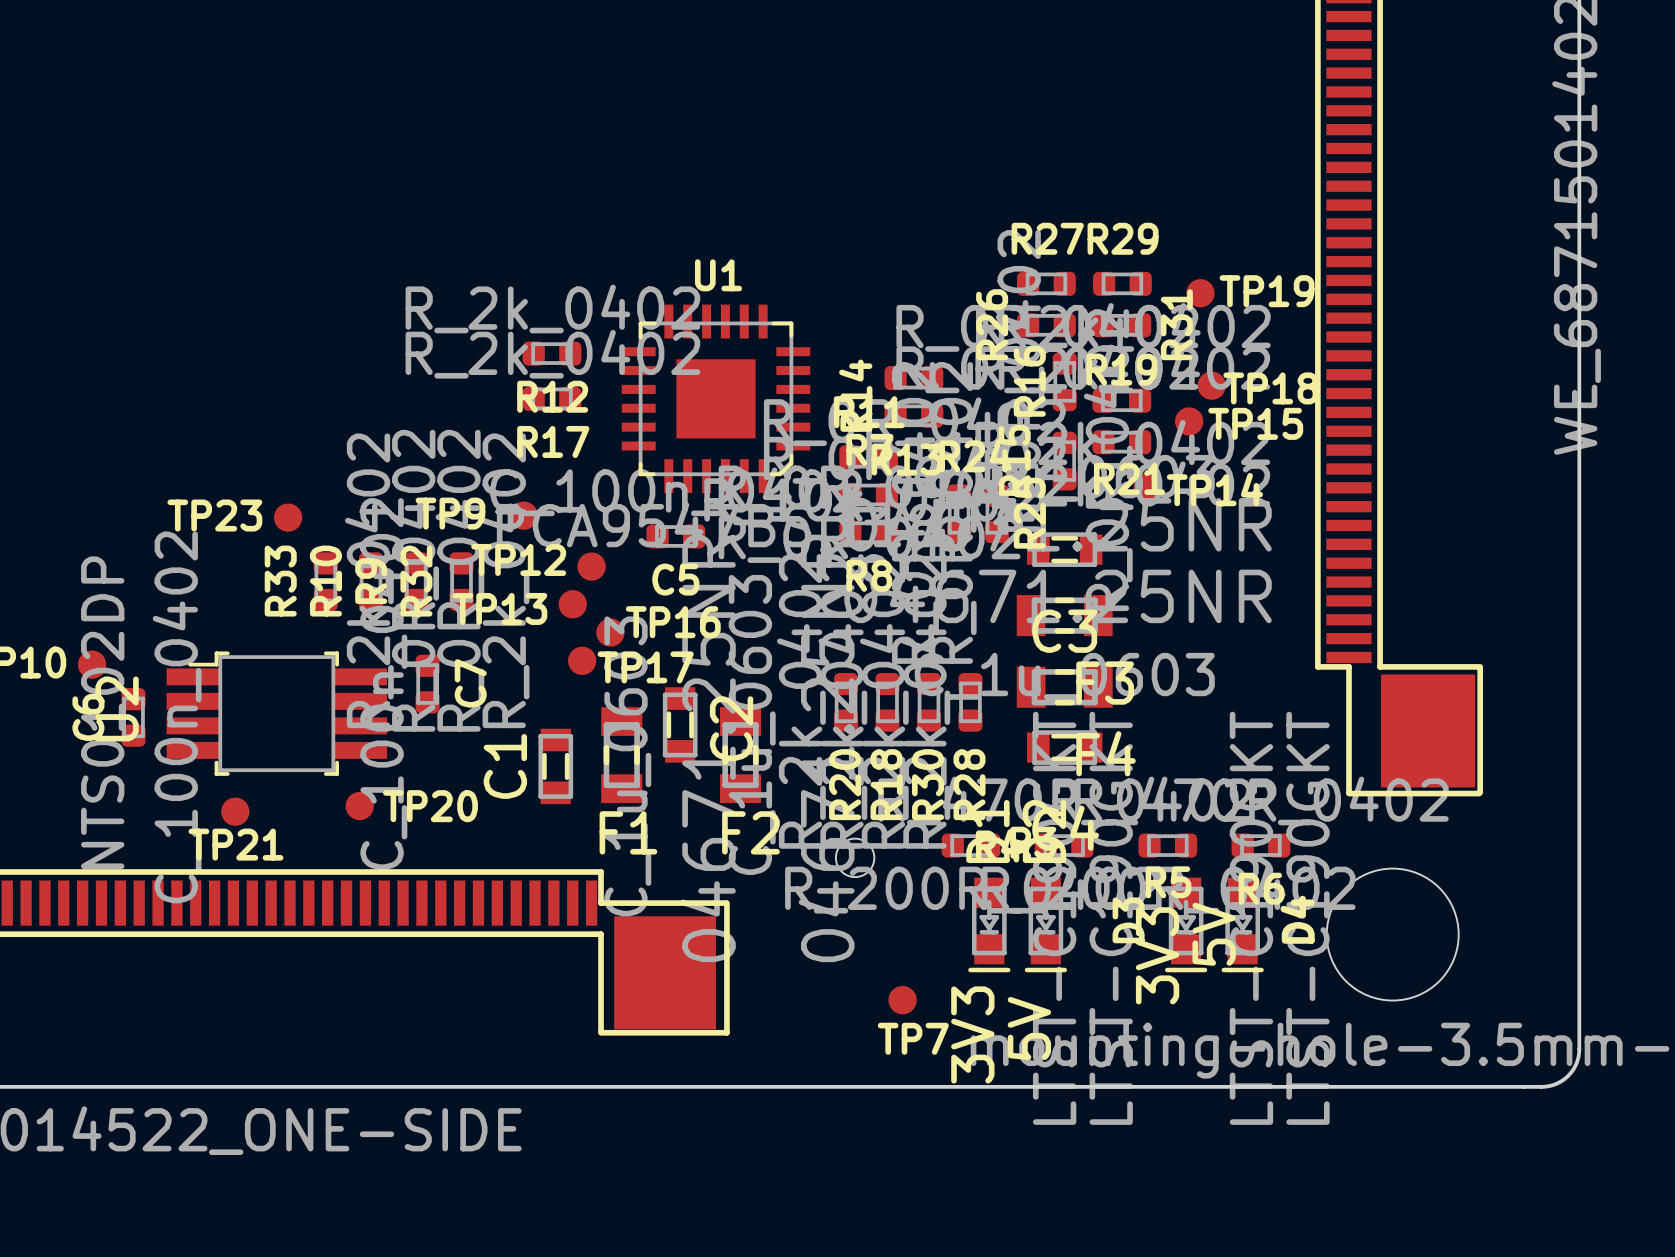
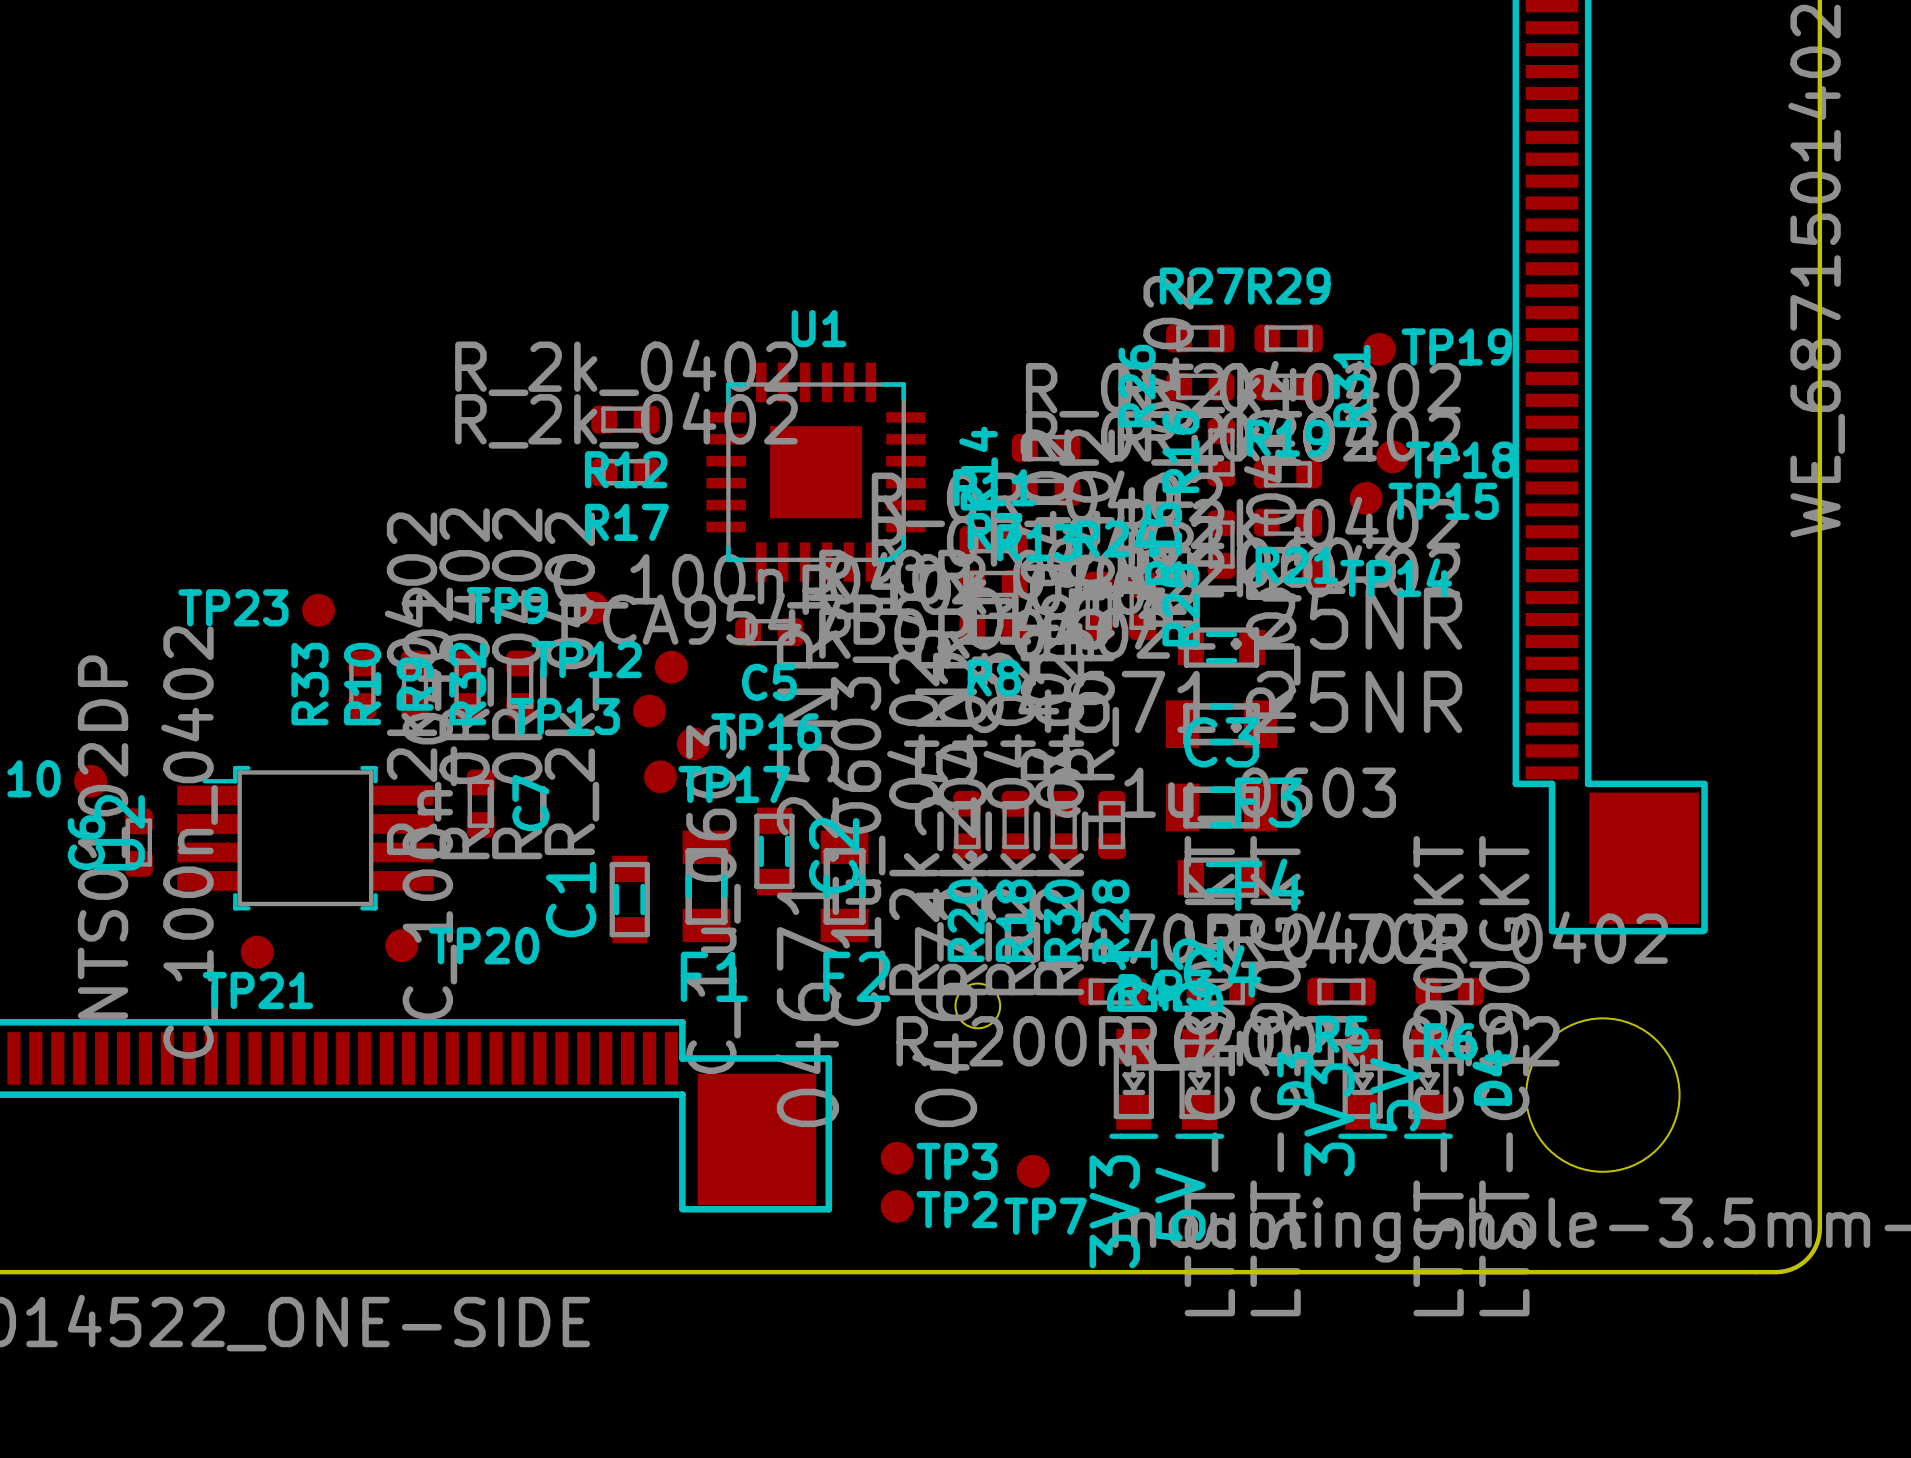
TP3: none -> (897, 1158)
TP2: none -> (897, 1206)

